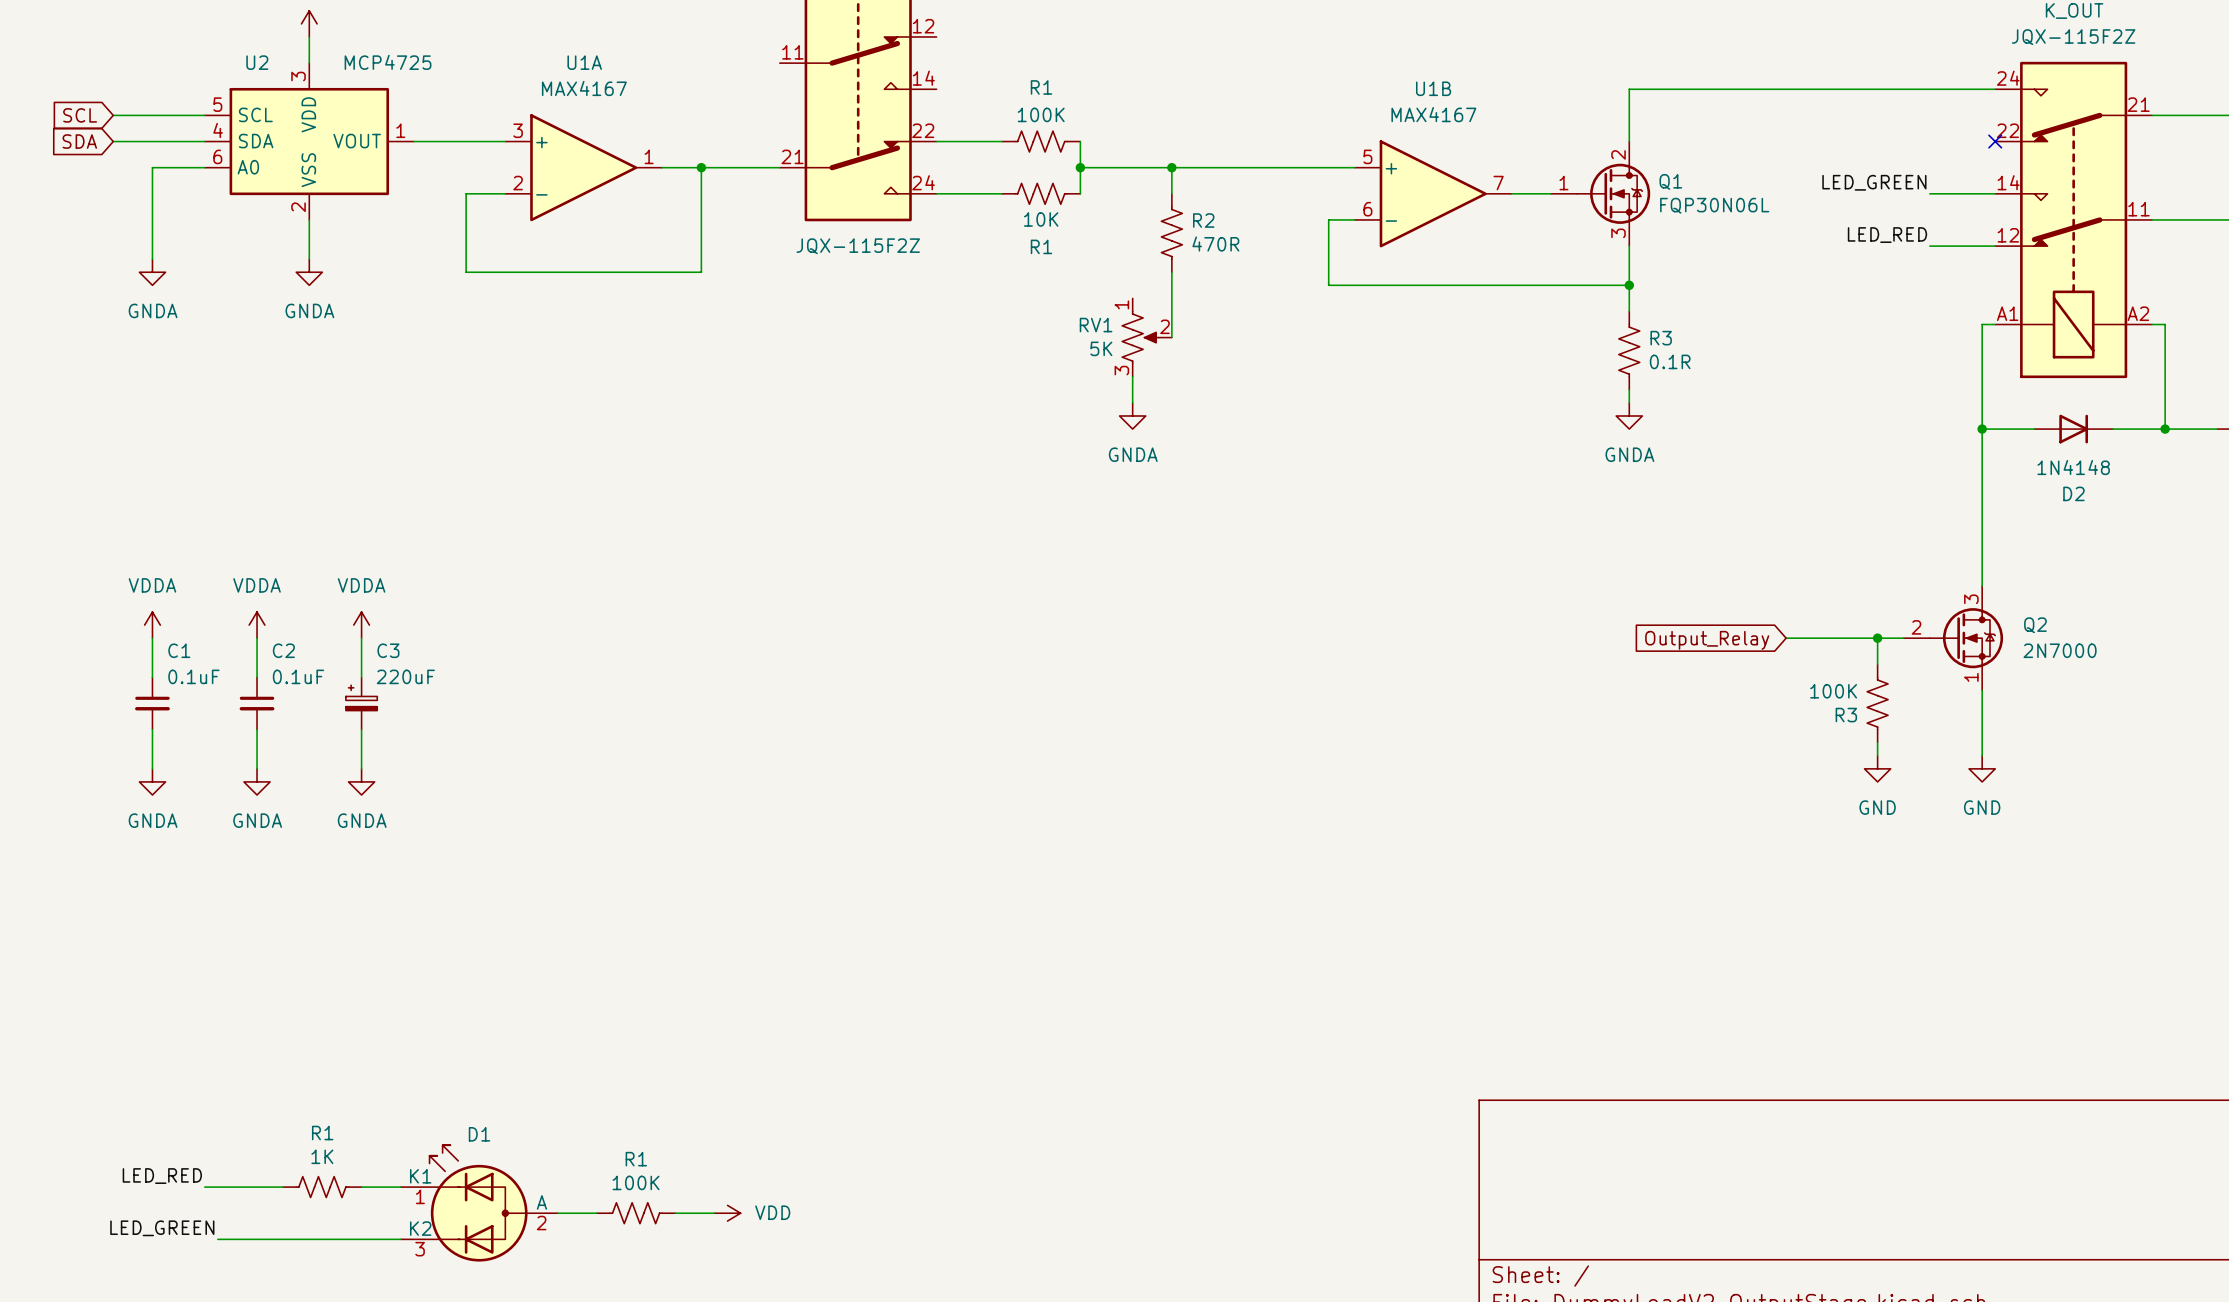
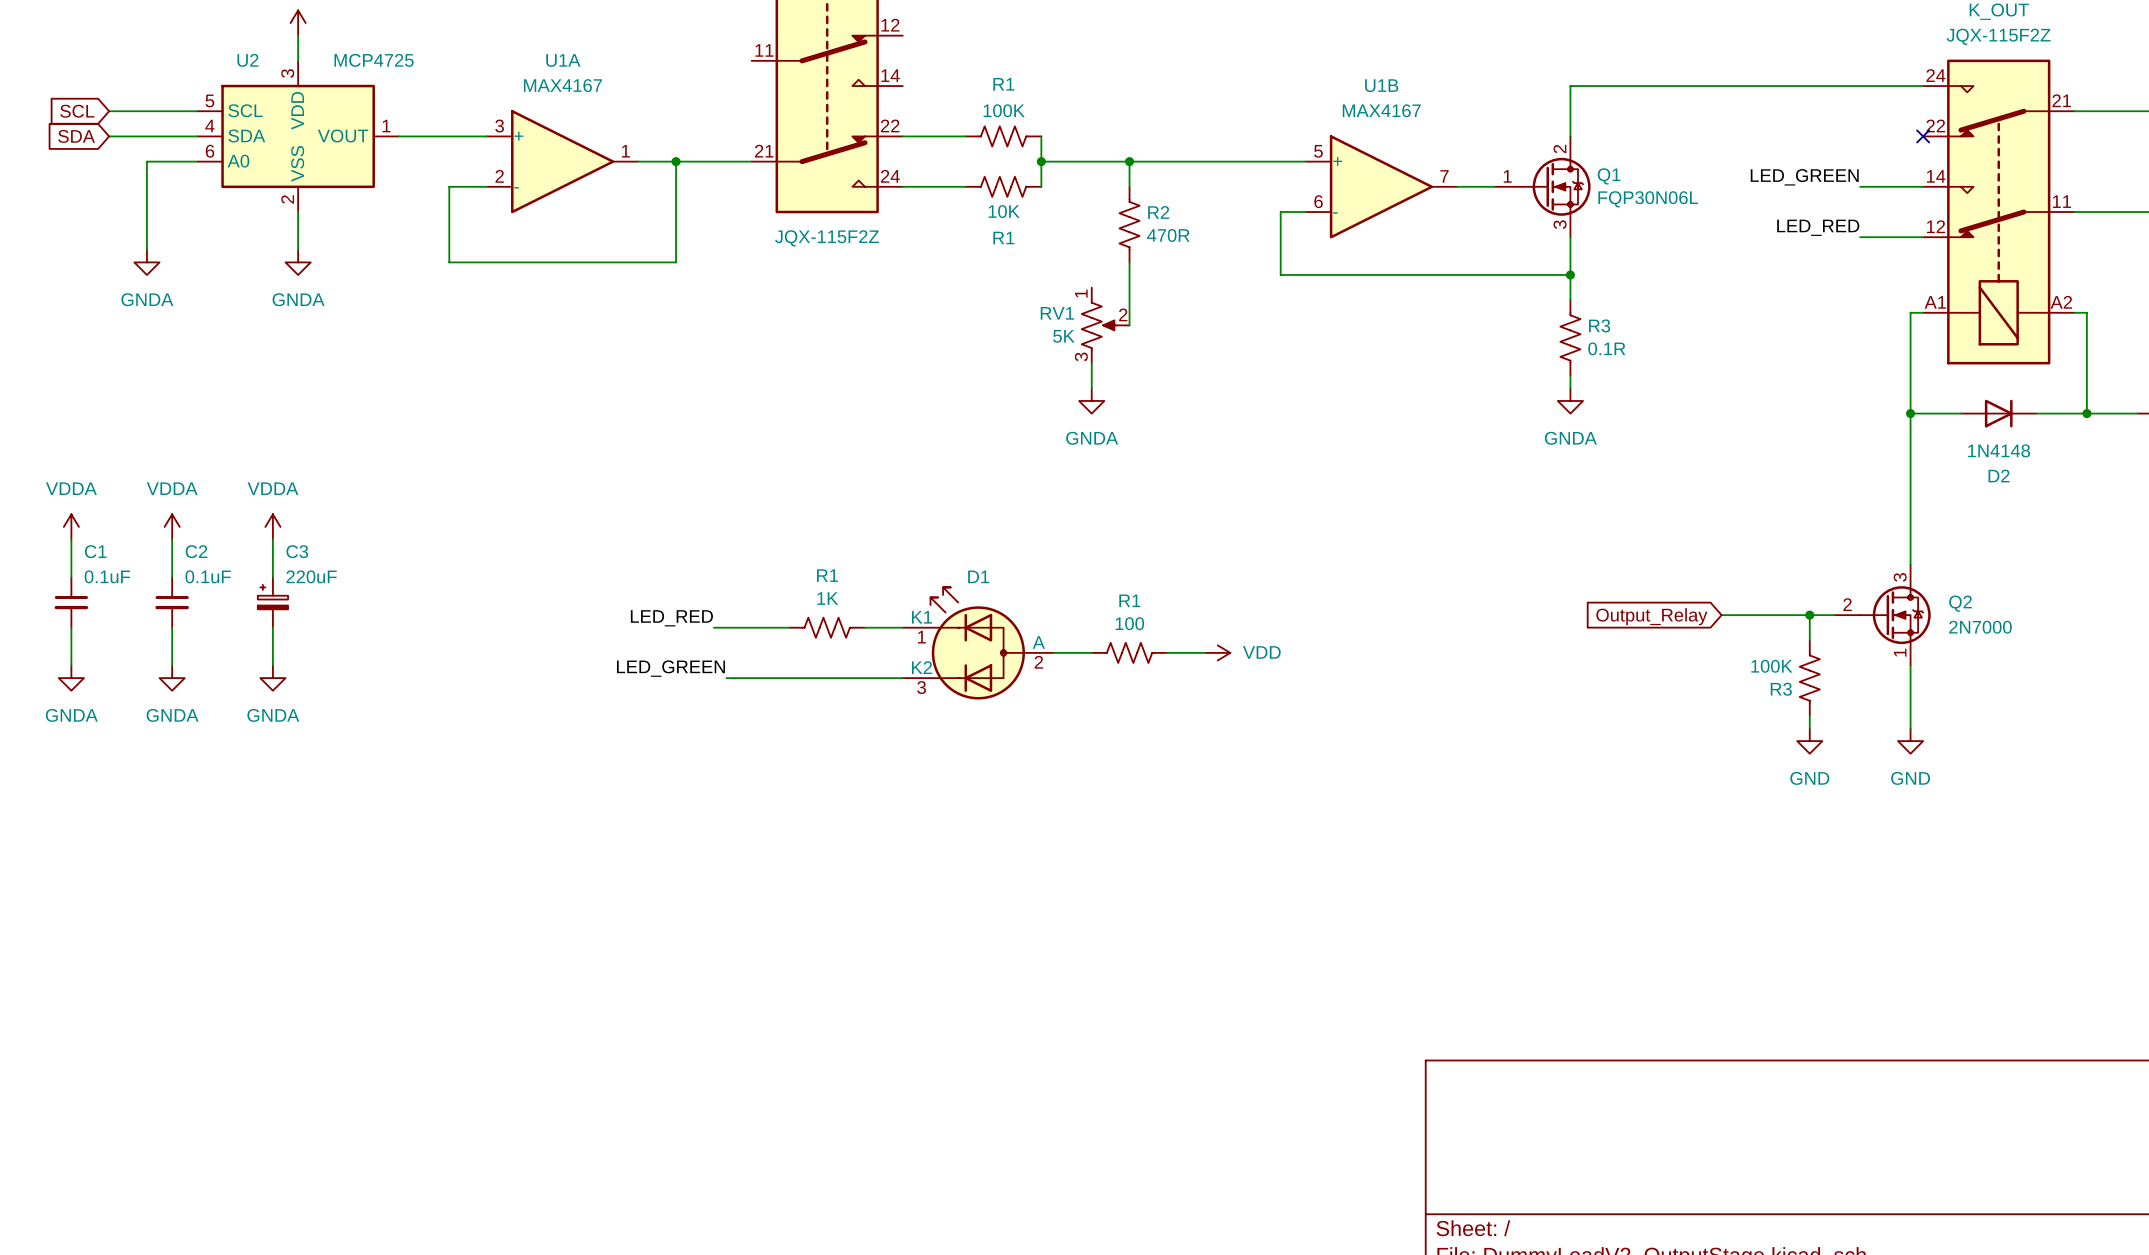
power symbol: none -> VDDA (71, 526)
power symbol: none -> VDDA (172, 526)
power symbol: none -> VDDA (272, 526)
power symbol: VDDA (152, 625) -> none
power symbol: VDDA (257, 625) -> none
power symbol: VDDA (361, 625) -> none
wire: (152, 638) (152, 677) -> (71, 539) (71, 577)
wire: (257, 638) (257, 677) -> (172, 539) (172, 577)
wire: (361, 638) (361, 677) -> (272, 539) (272, 577)
label: none -> LED_RED (671, 618)
wire: none -> (713, 627) (789, 627)
R1: none -> 1K (827, 627)
wire: none -> (864, 627) (902, 627)
wire: none -> (1053, 652) (1091, 652)
R1: none -> 100 (1129, 652)
wire: none -> (1167, 652) (1205, 652)
power symbol: none -> VDD (1217, 652)
label: none -> LED_GREEN (670, 668)
power symbol: none -> GNDA (71, 678)
C1 position: (152, 703) -> (71, 602)
power symbol: none -> GNDA (172, 678)
C2 position: (257, 703) -> (172, 602)
power symbol: none -> GNDA (272, 678)
C3 position: (361, 703) -> (272, 602)
wire: none -> (726, 678) (902, 678)
wire: (152, 729) (152, 768) -> (71, 627) (71, 665)
wire: (257, 729) (257, 768) -> (172, 627) (172, 665)
wire: (361, 729) (361, 768) -> (272, 627) (272, 665)
power symbol: GNDA (152, 781) -> none
power symbol: GNDA (257, 781) -> none
power symbol: GNDA (361, 781) -> none
label: LED_RED (162, 1176) -> none
wire: (204, 1187) (283, 1187) -> none
R1: 1K (322, 1187) -> none
wire: (361, 1187) (400, 1187) -> none
D1 position: (479, 1203) -> (978, 643)
wire: (557, 1213) (596, 1213) -> none
R1: 100K (636, 1213) -> none
wire: (675, 1213) (714, 1213) -> none
power symbol: VDD (727, 1213) -> none
label: LED_GREEN (162, 1228) -> none
wire: (217, 1239) (400, 1239) -> none

